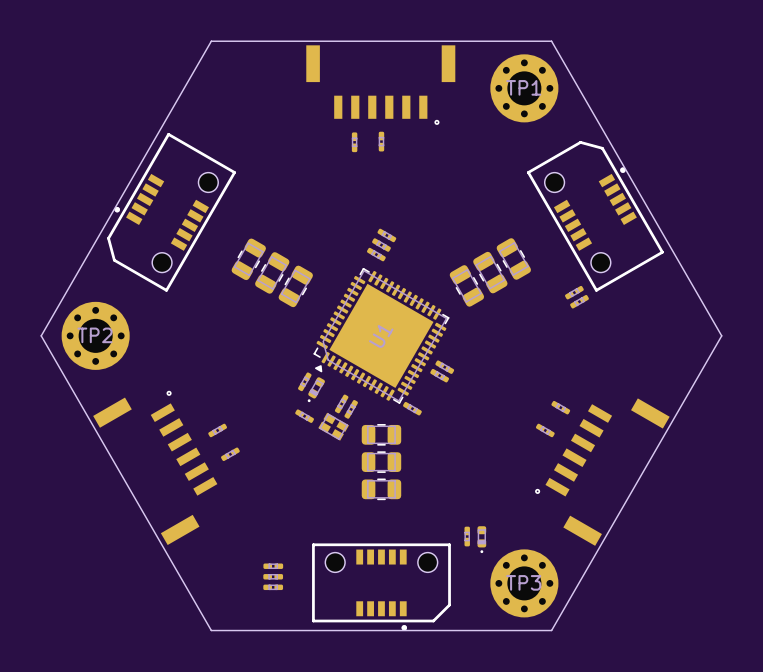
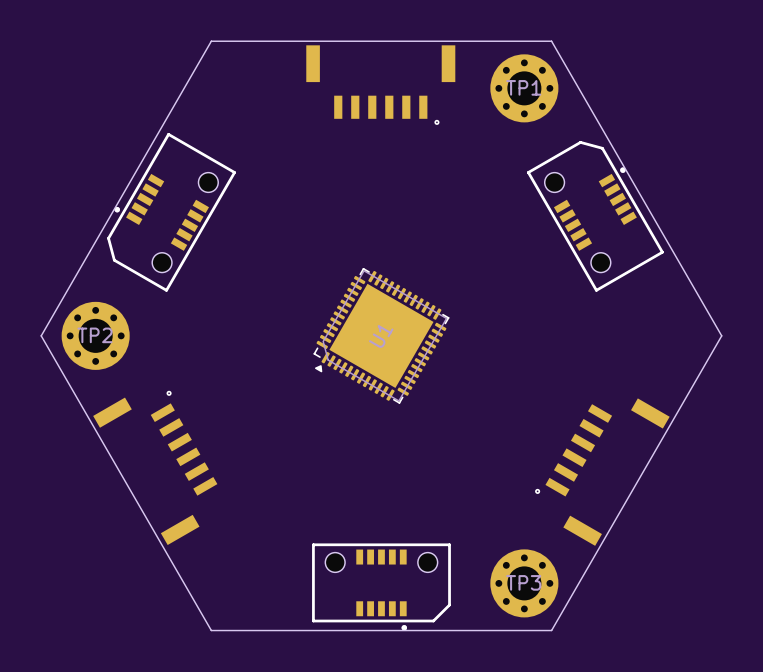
part: (381, 141) -> none
part: (354, 142) -> none
part: (386, 235) -> none
part: (381, 245) -> none
part: (376, 254) -> none
part: (513, 258) -> none
part: (248, 259) -> none
part: (272, 272) -> none
part: (490, 272) -> none
part: (466, 285) -> none
part: (295, 286) -> none
part: (574, 292) -> none
part: (579, 301) -> none
part: (444, 367) -> none
part: (439, 375) -> none
part: (304, 381) -> none
part: (316, 389) -> none
part: (341, 403) -> none
part: (560, 407) -> none
part: (412, 408) -> none
part: (351, 409) -> none
part: (304, 416) -> none
part: (333, 426) -> none
part: (217, 430) -> none
part: (545, 430) -> none
part: (381, 434) -> none
part: (230, 454) -> none
part: (381, 462) -> none
part: (381, 489) -> none
part: (467, 536) -> none
part: (481, 539) -> none
part: (273, 566) -> none
part: (273, 576) -> none
part: (273, 587) -> none

